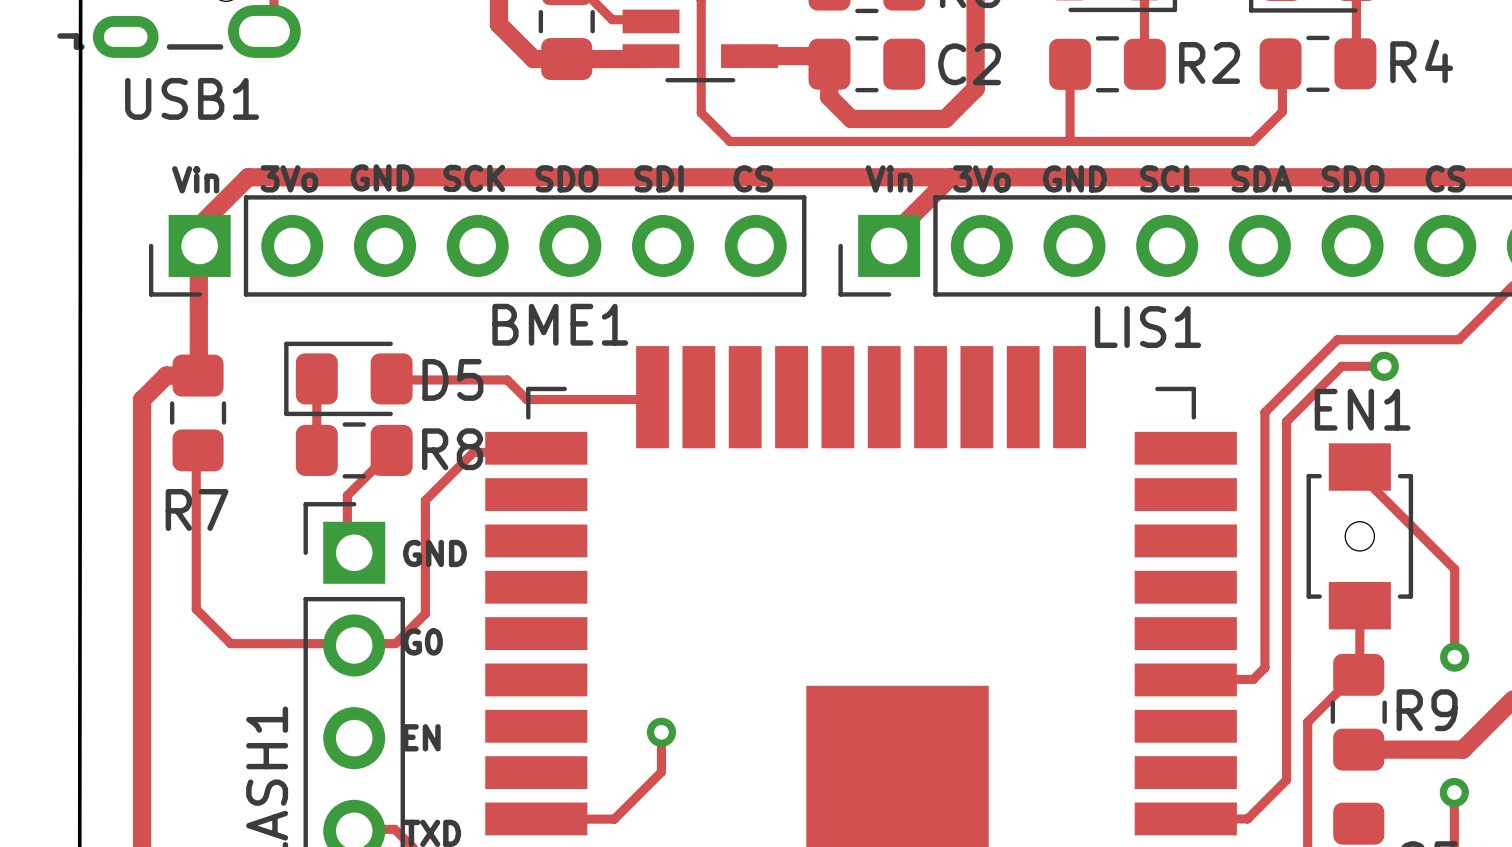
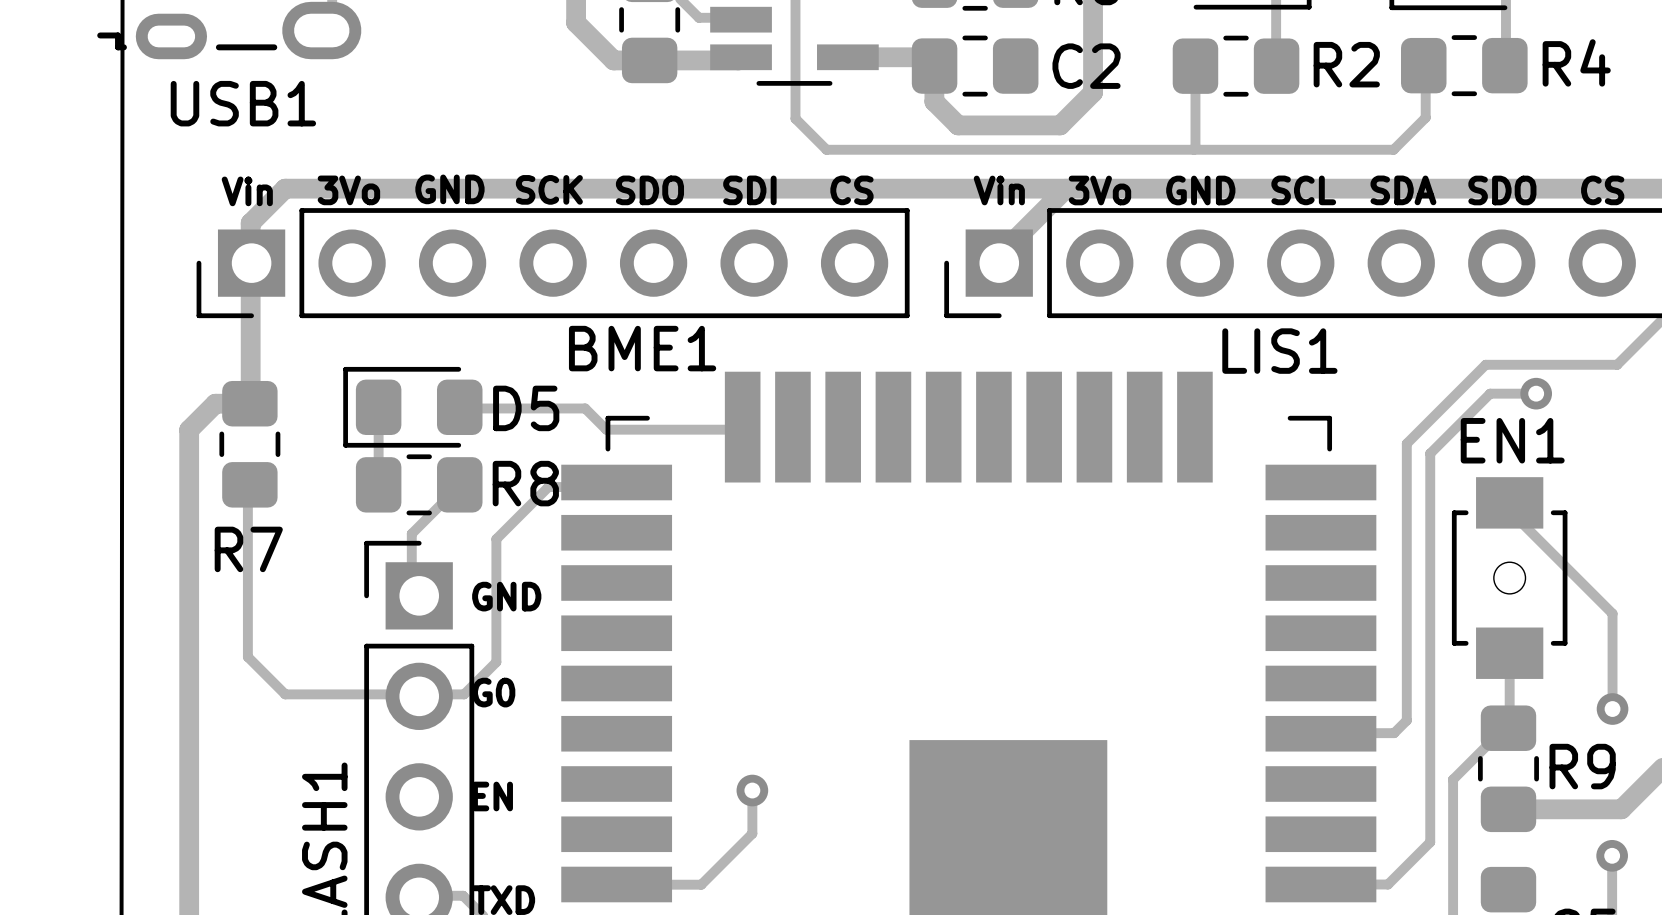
track: (248, 177) (190, 234) (190, 248) -> (304, 188) (285, 188) (250, 223) (250, 257)

